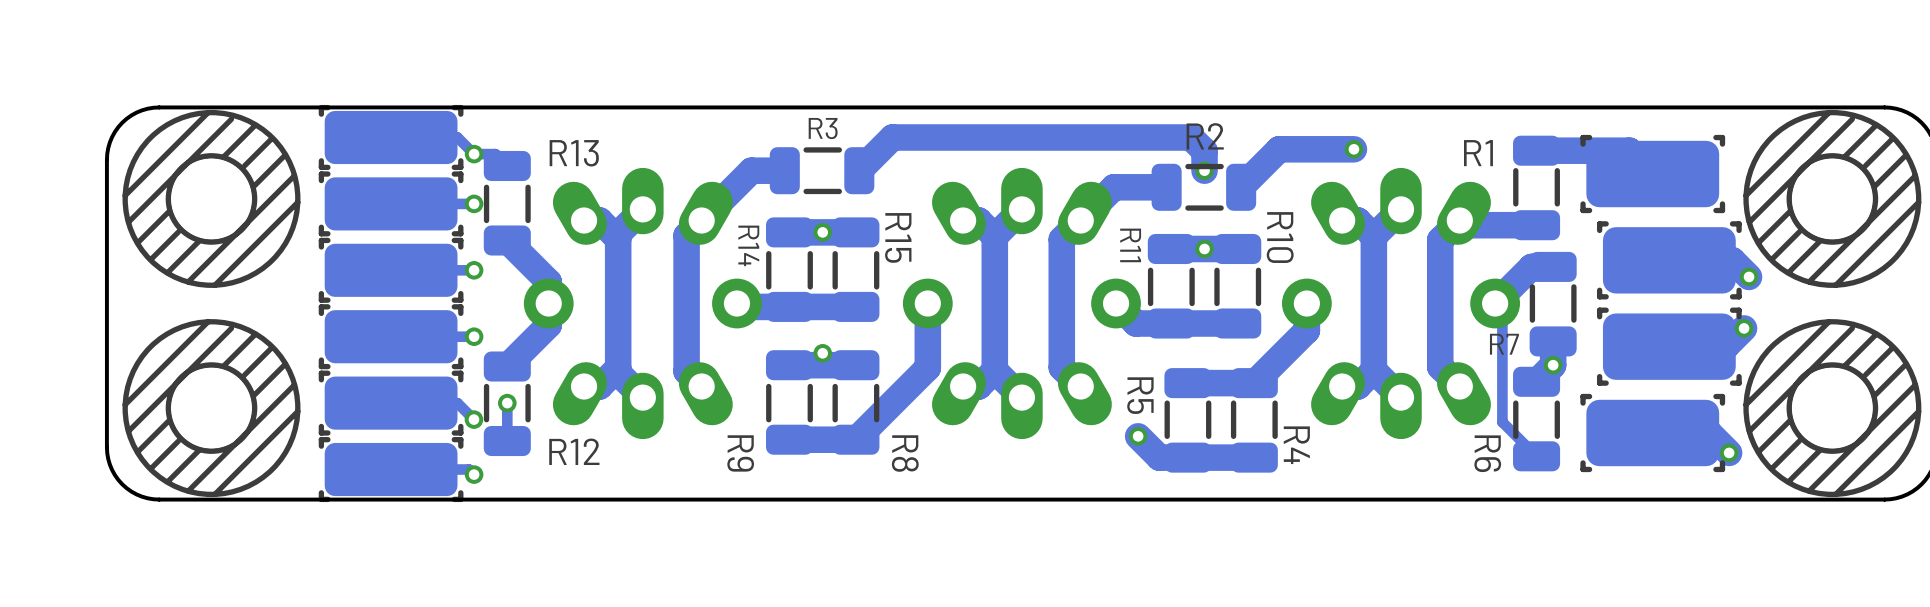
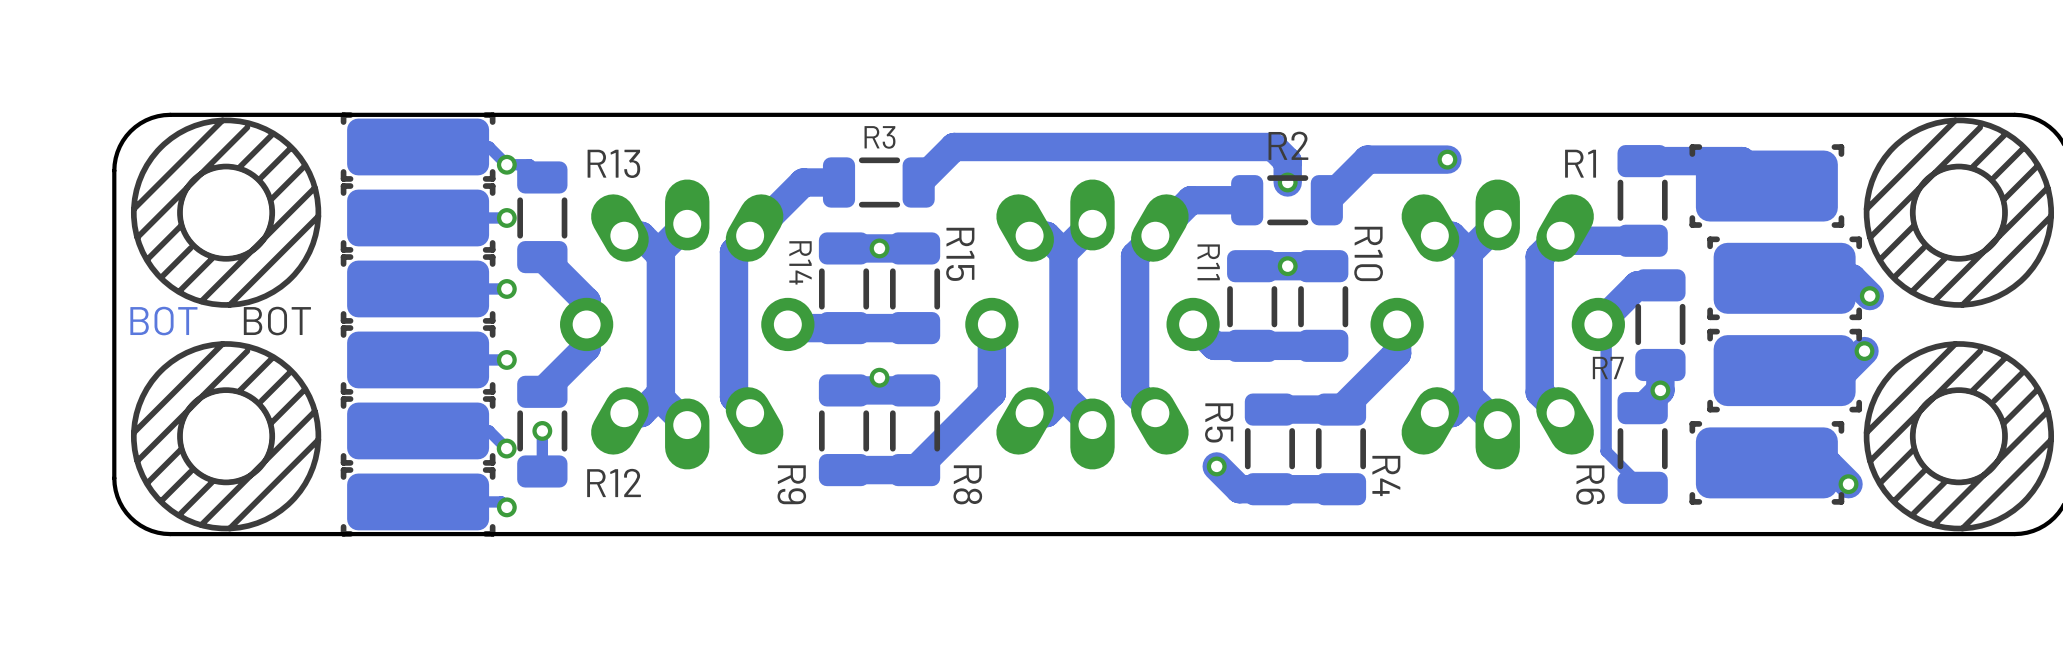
text: none -> BOT (163, 321)
text: none -> BOT (277, 321)

